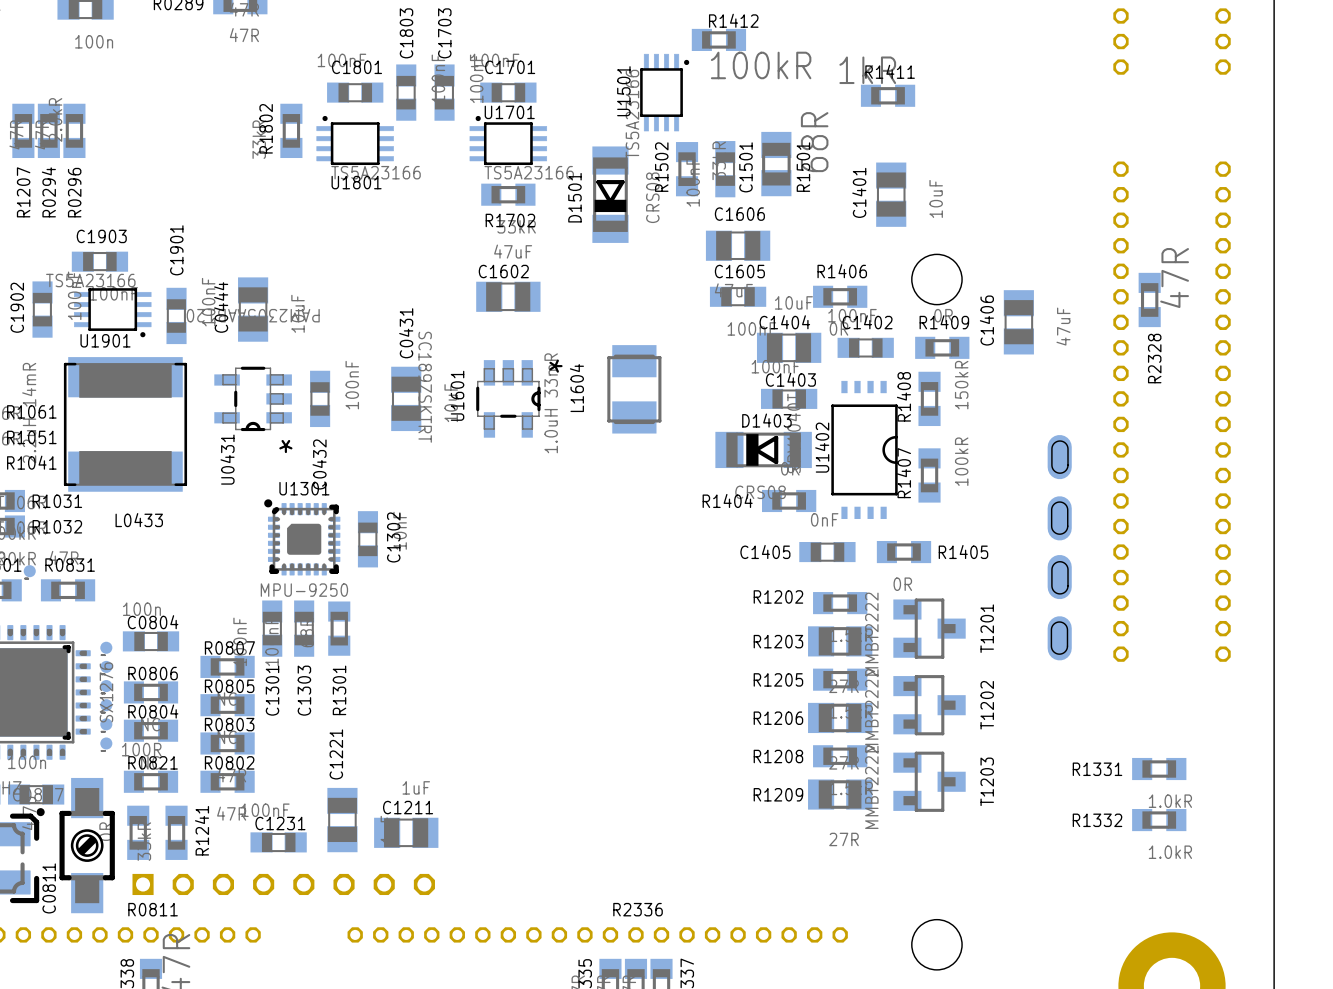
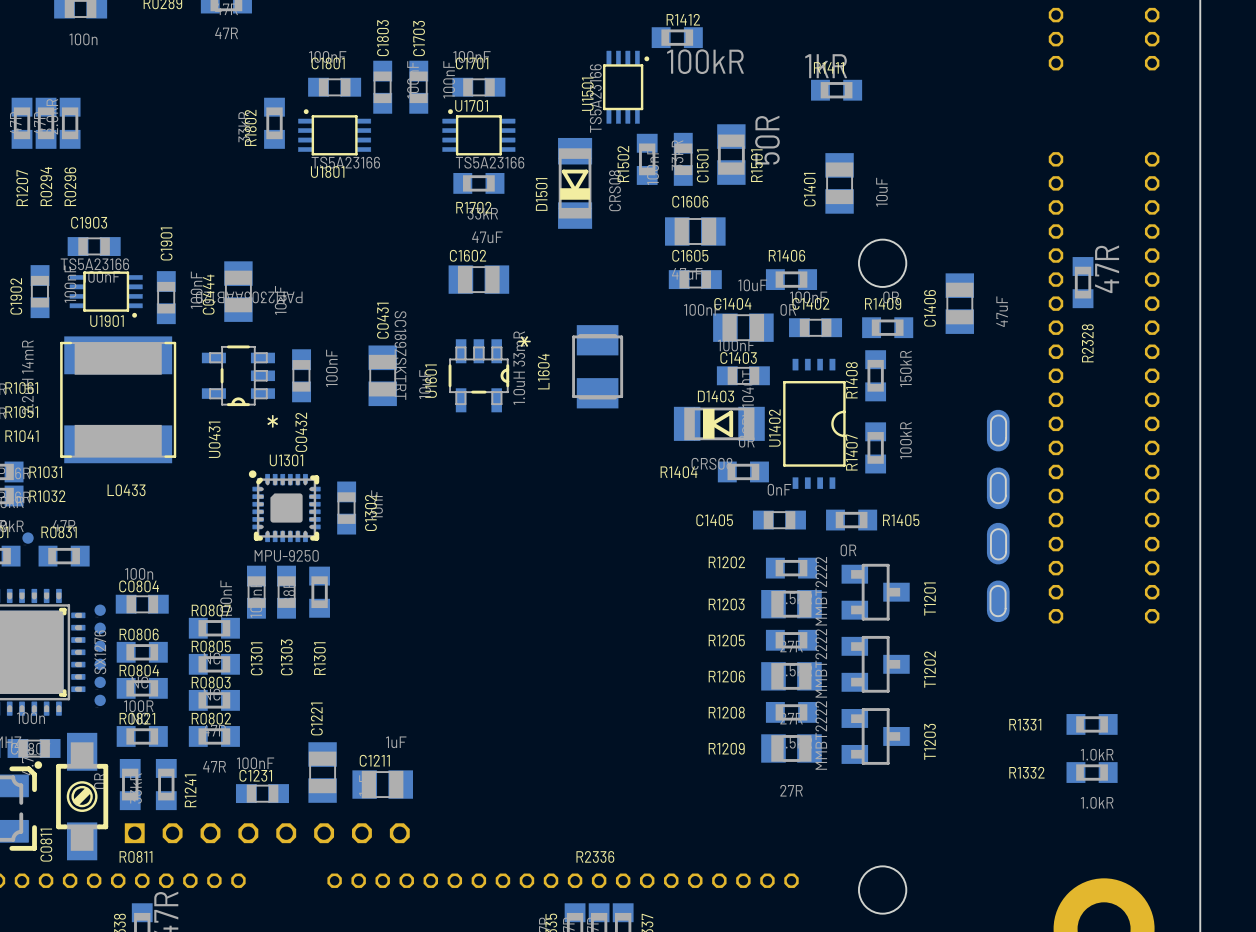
R1501 value: 68R (814, 142) -> 50R (767, 140)

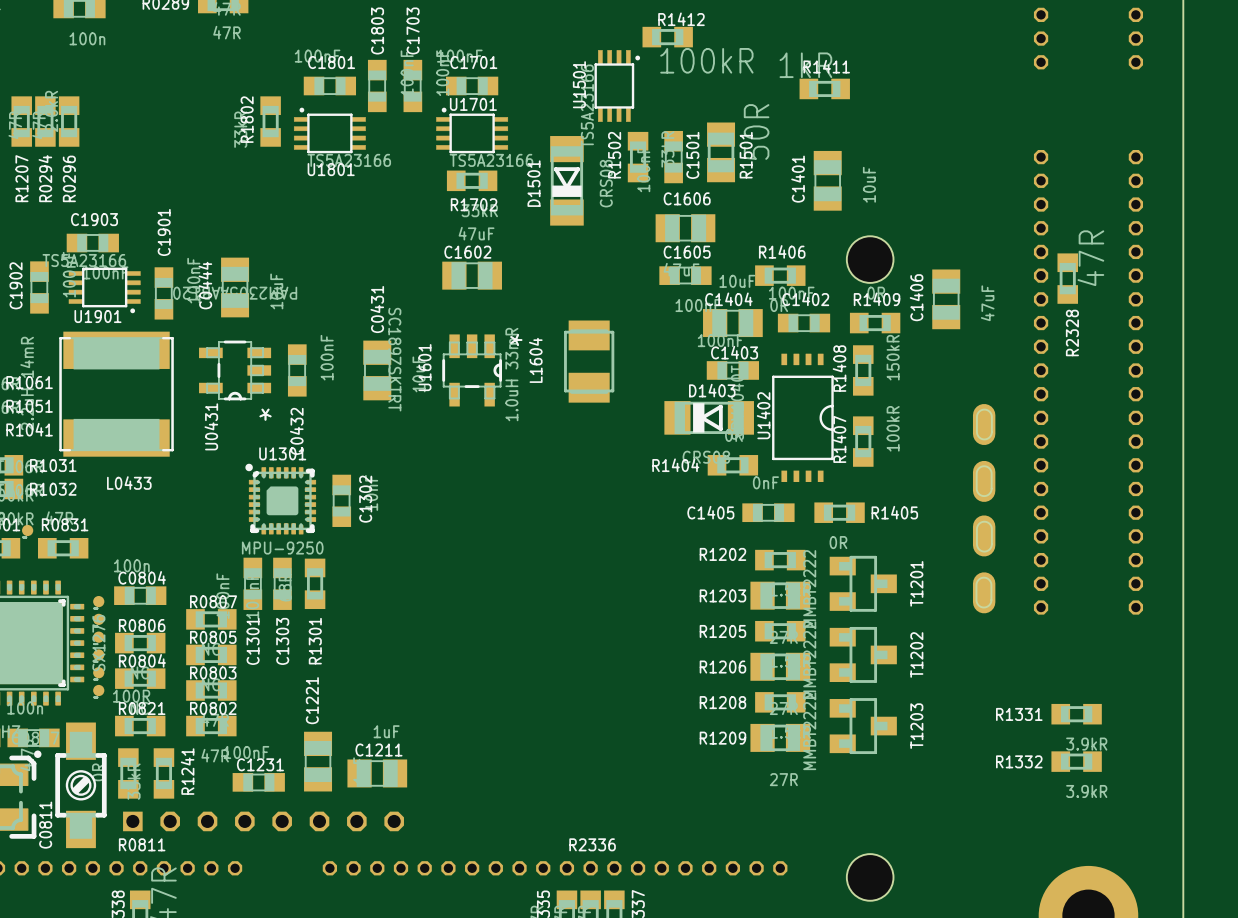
R1331 value: 1.0kR (1097, 754) -> 3.9kR (1086, 744)
R1332 value: 1.0kR (1097, 802) -> 3.9kR (1086, 791)

